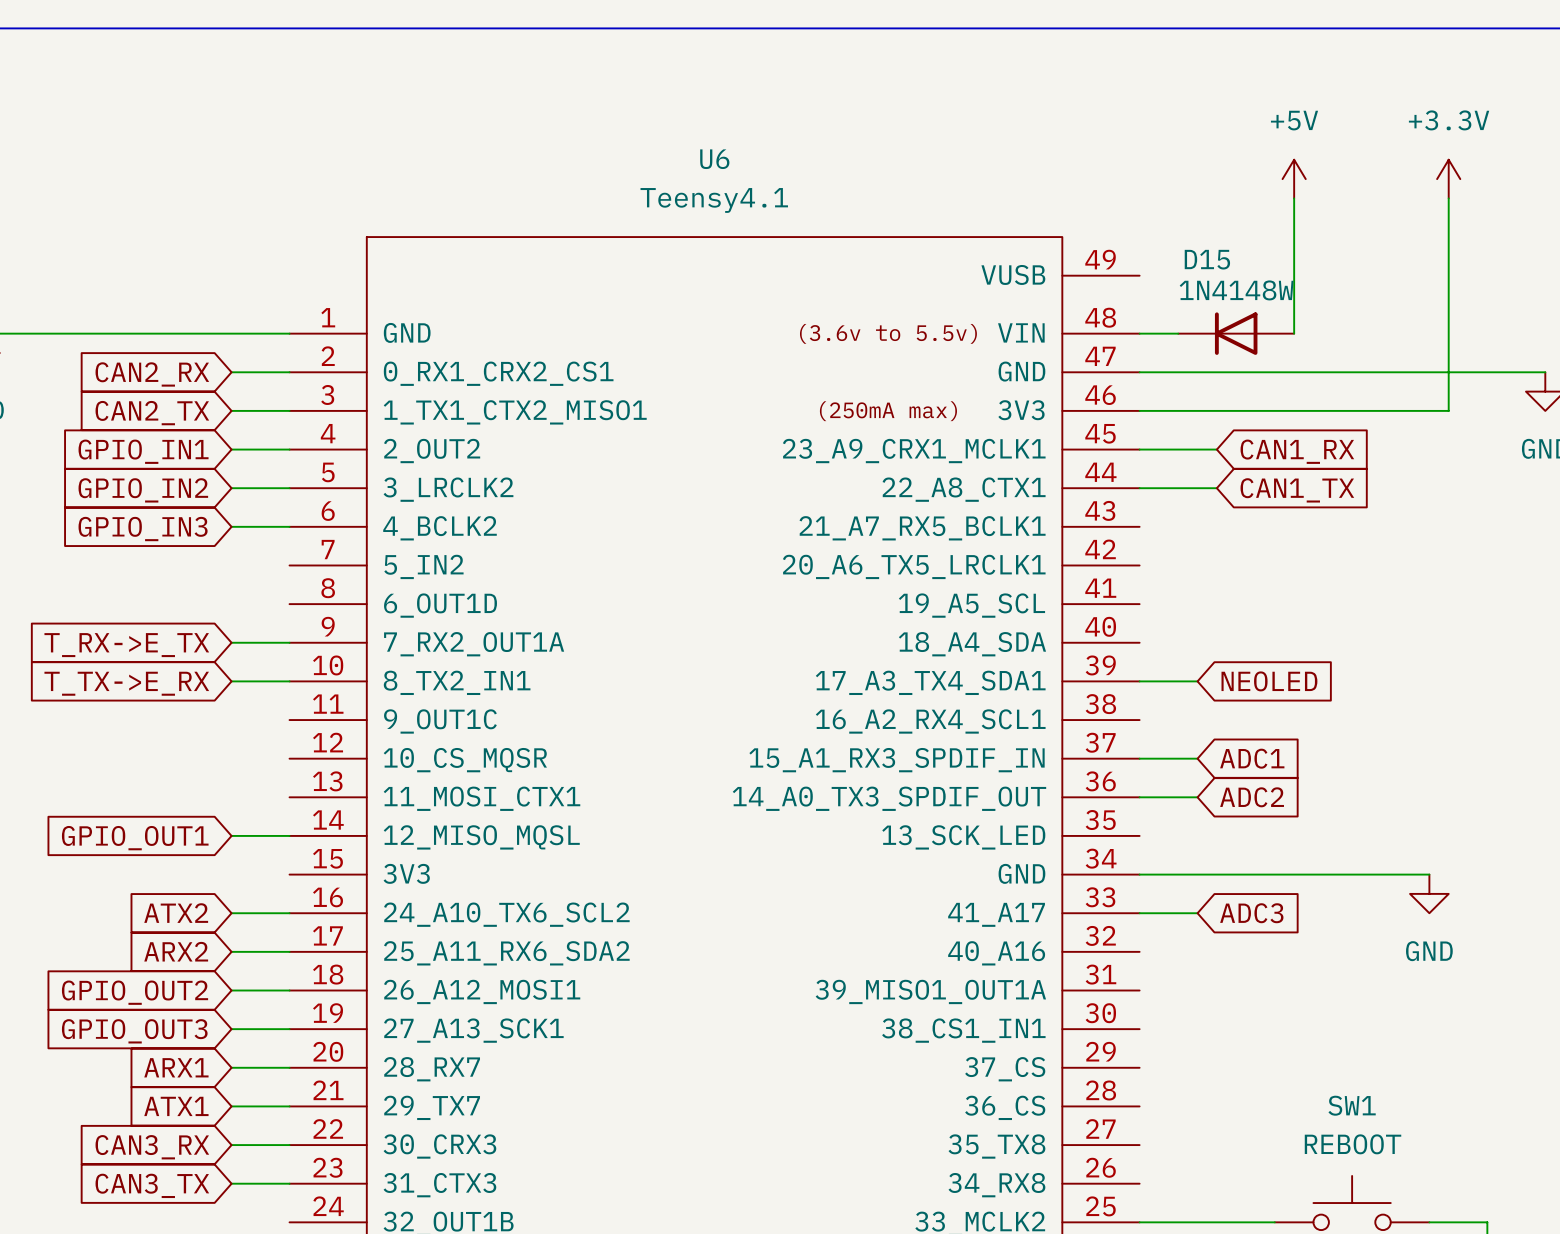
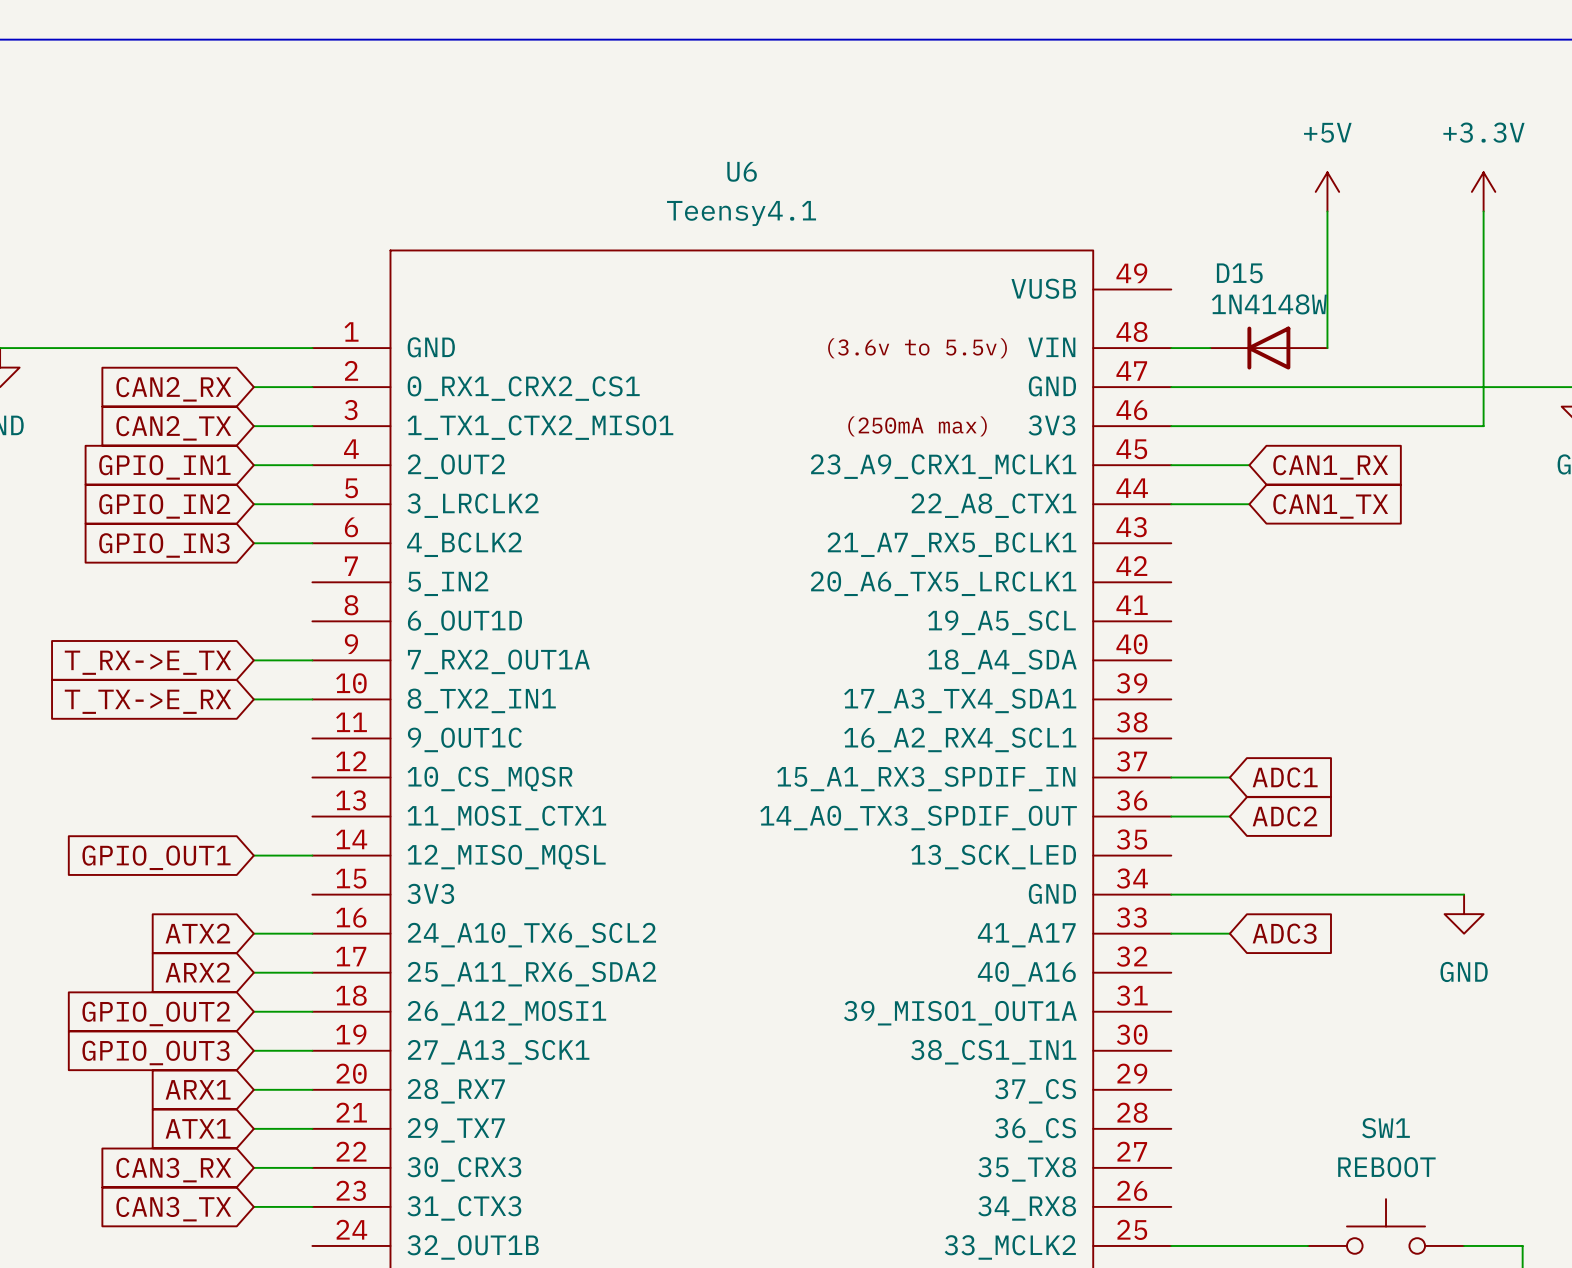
wire: (1139, 681) (1197, 681) -> none
global label: NEOLED (1269, 681) -> none

